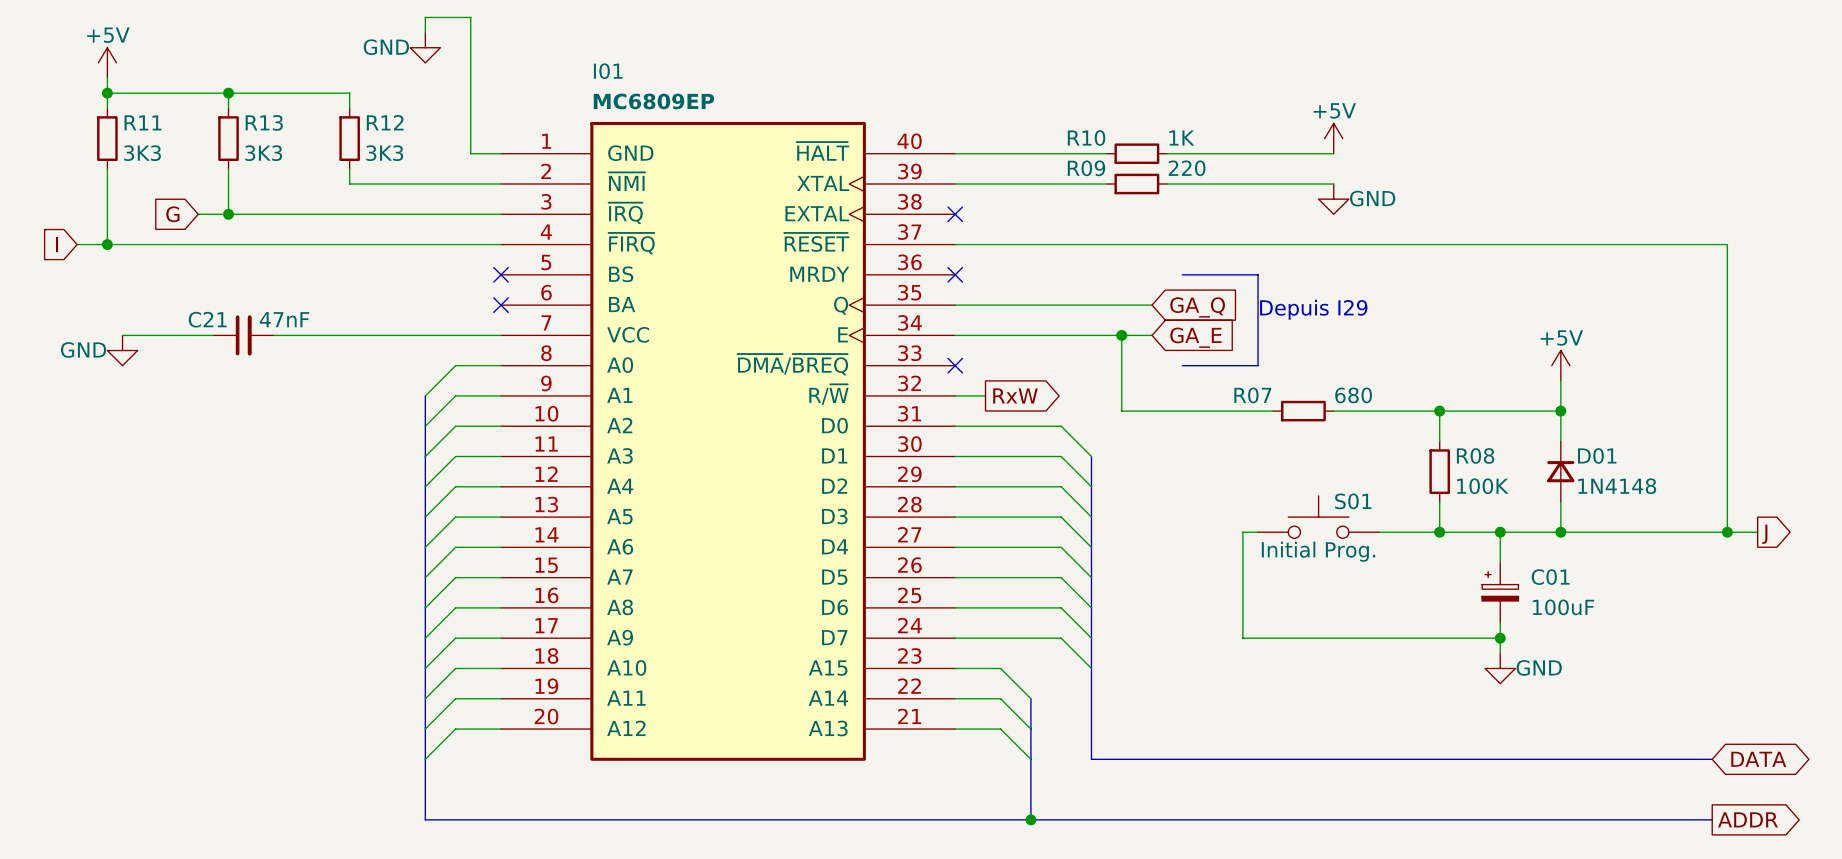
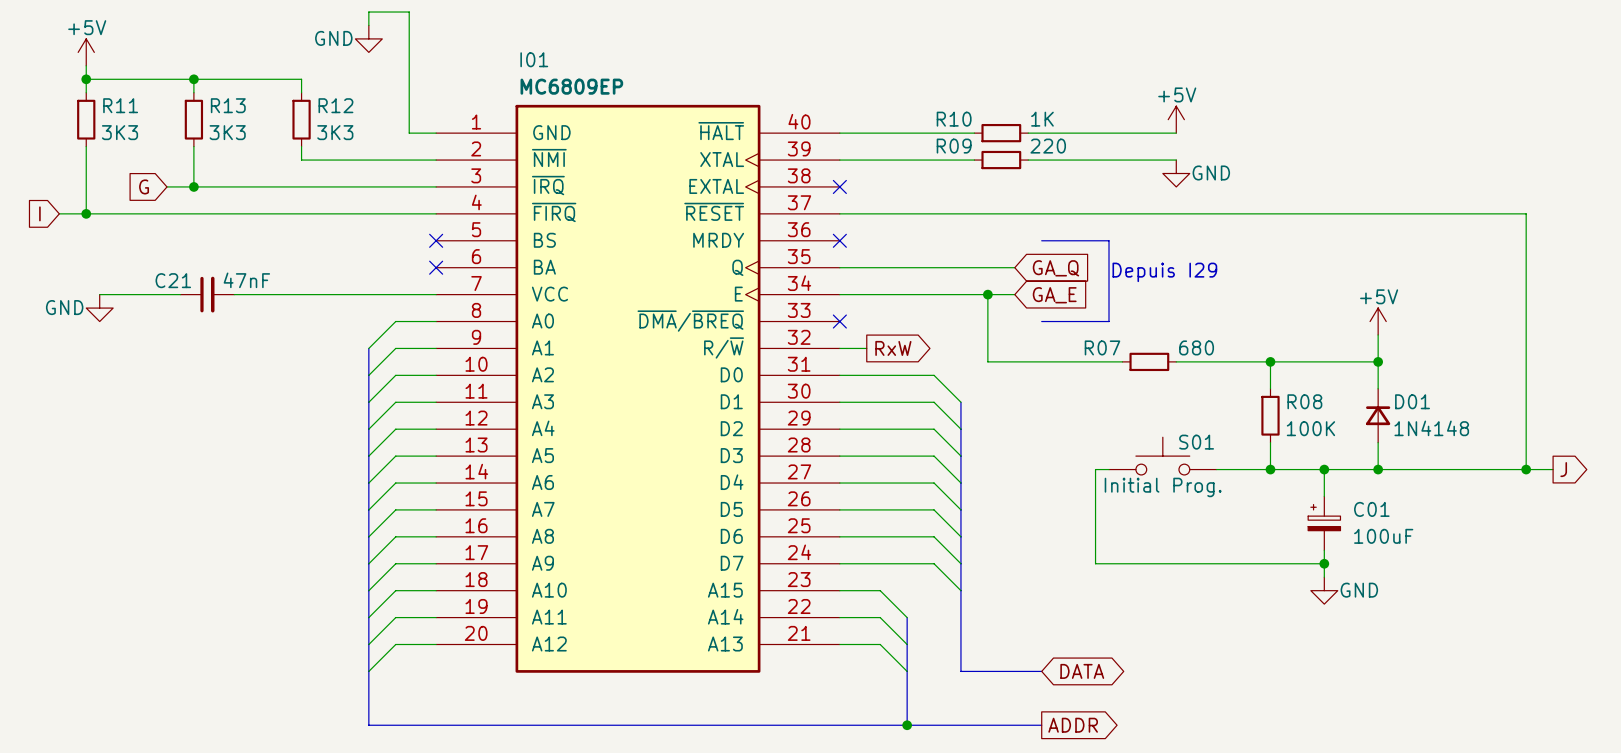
bus: (1182, 759) (1712, 759) -> none
global label: none -> DATA (1082, 671)
global label: DATA (1758, 759) -> none
bus: (1182, 819) (1712, 819) -> none
global label: none -> ADDR (1073, 725)
global label: ADDR (1747, 819) -> none

